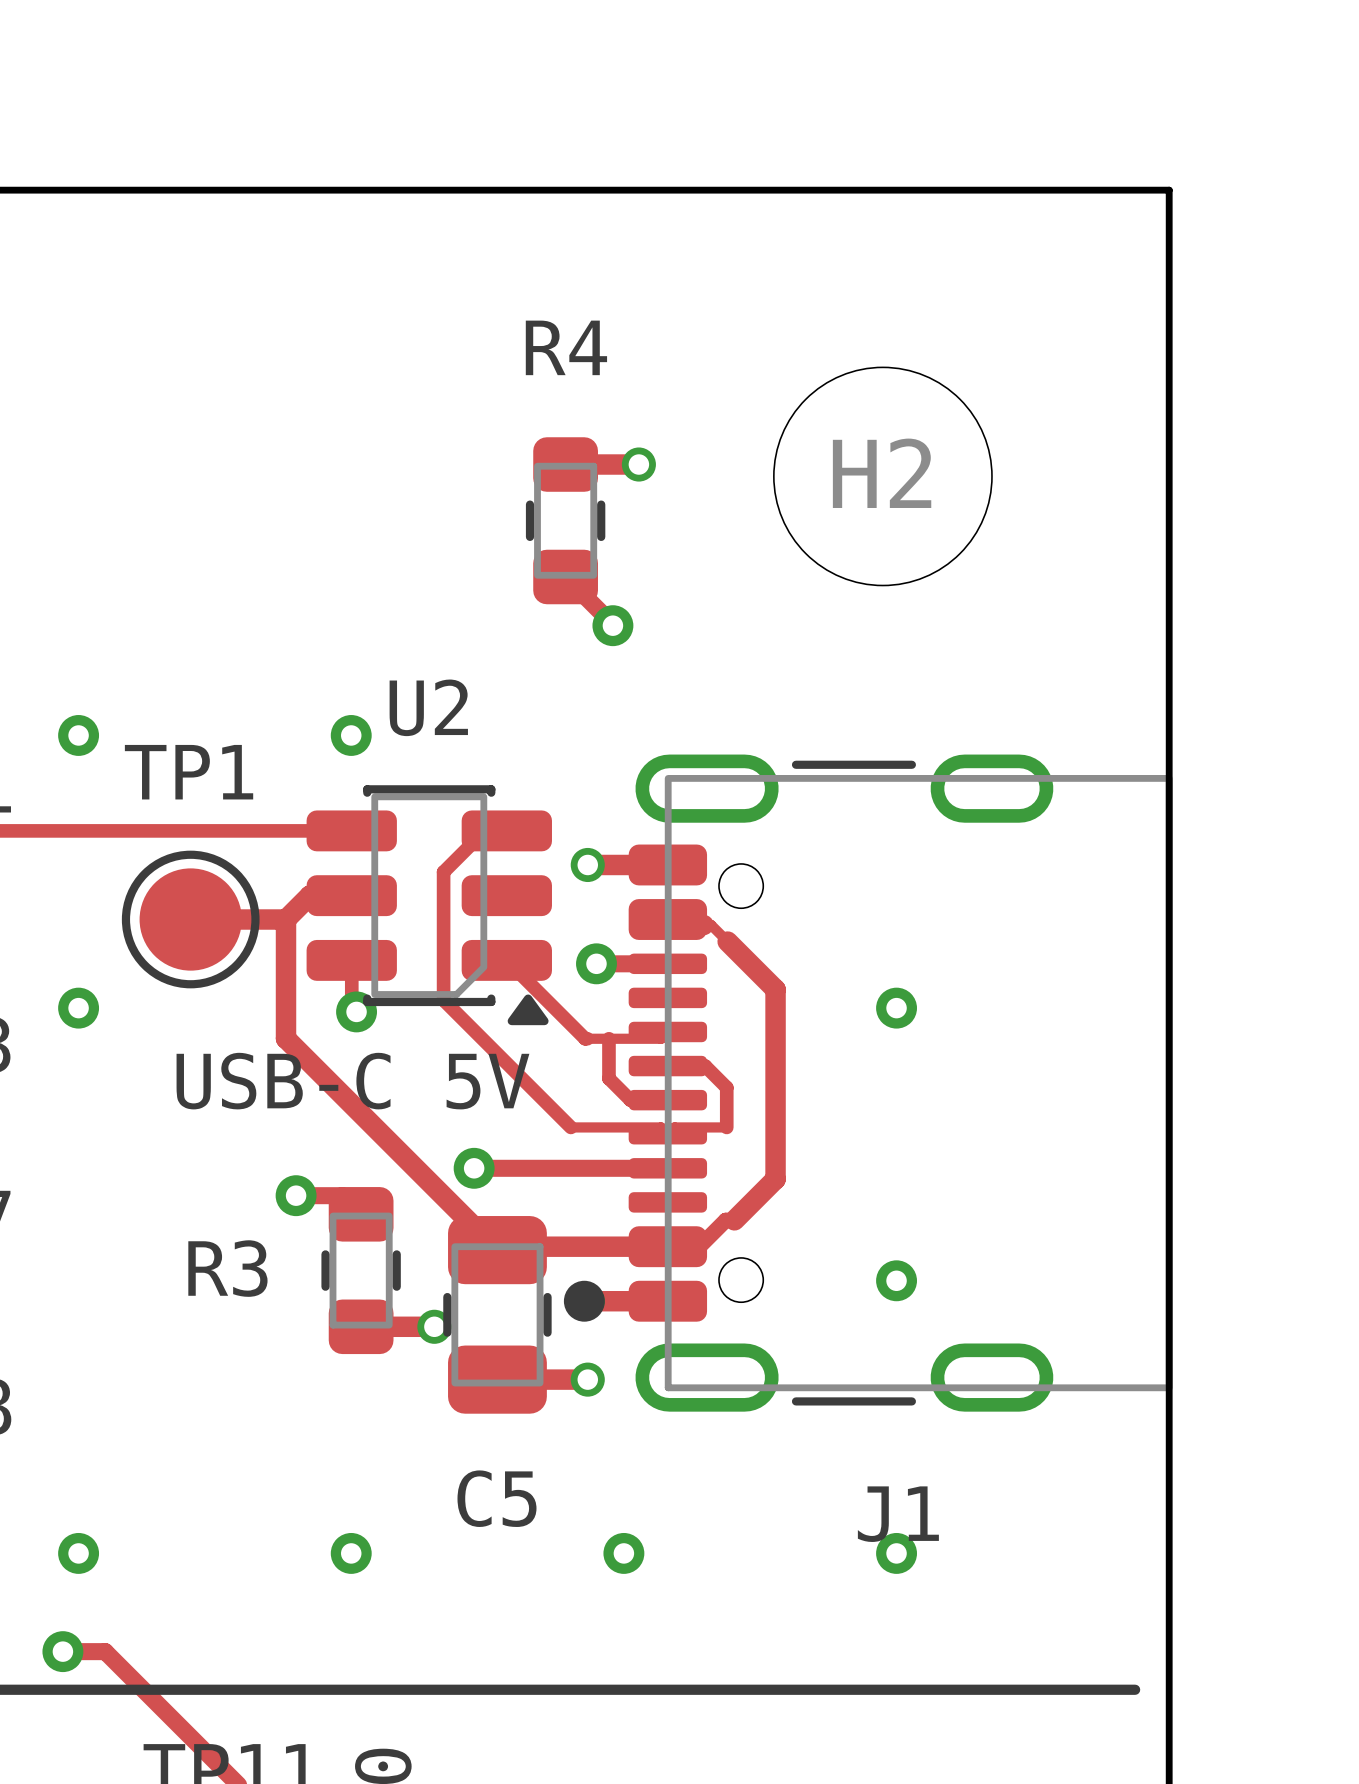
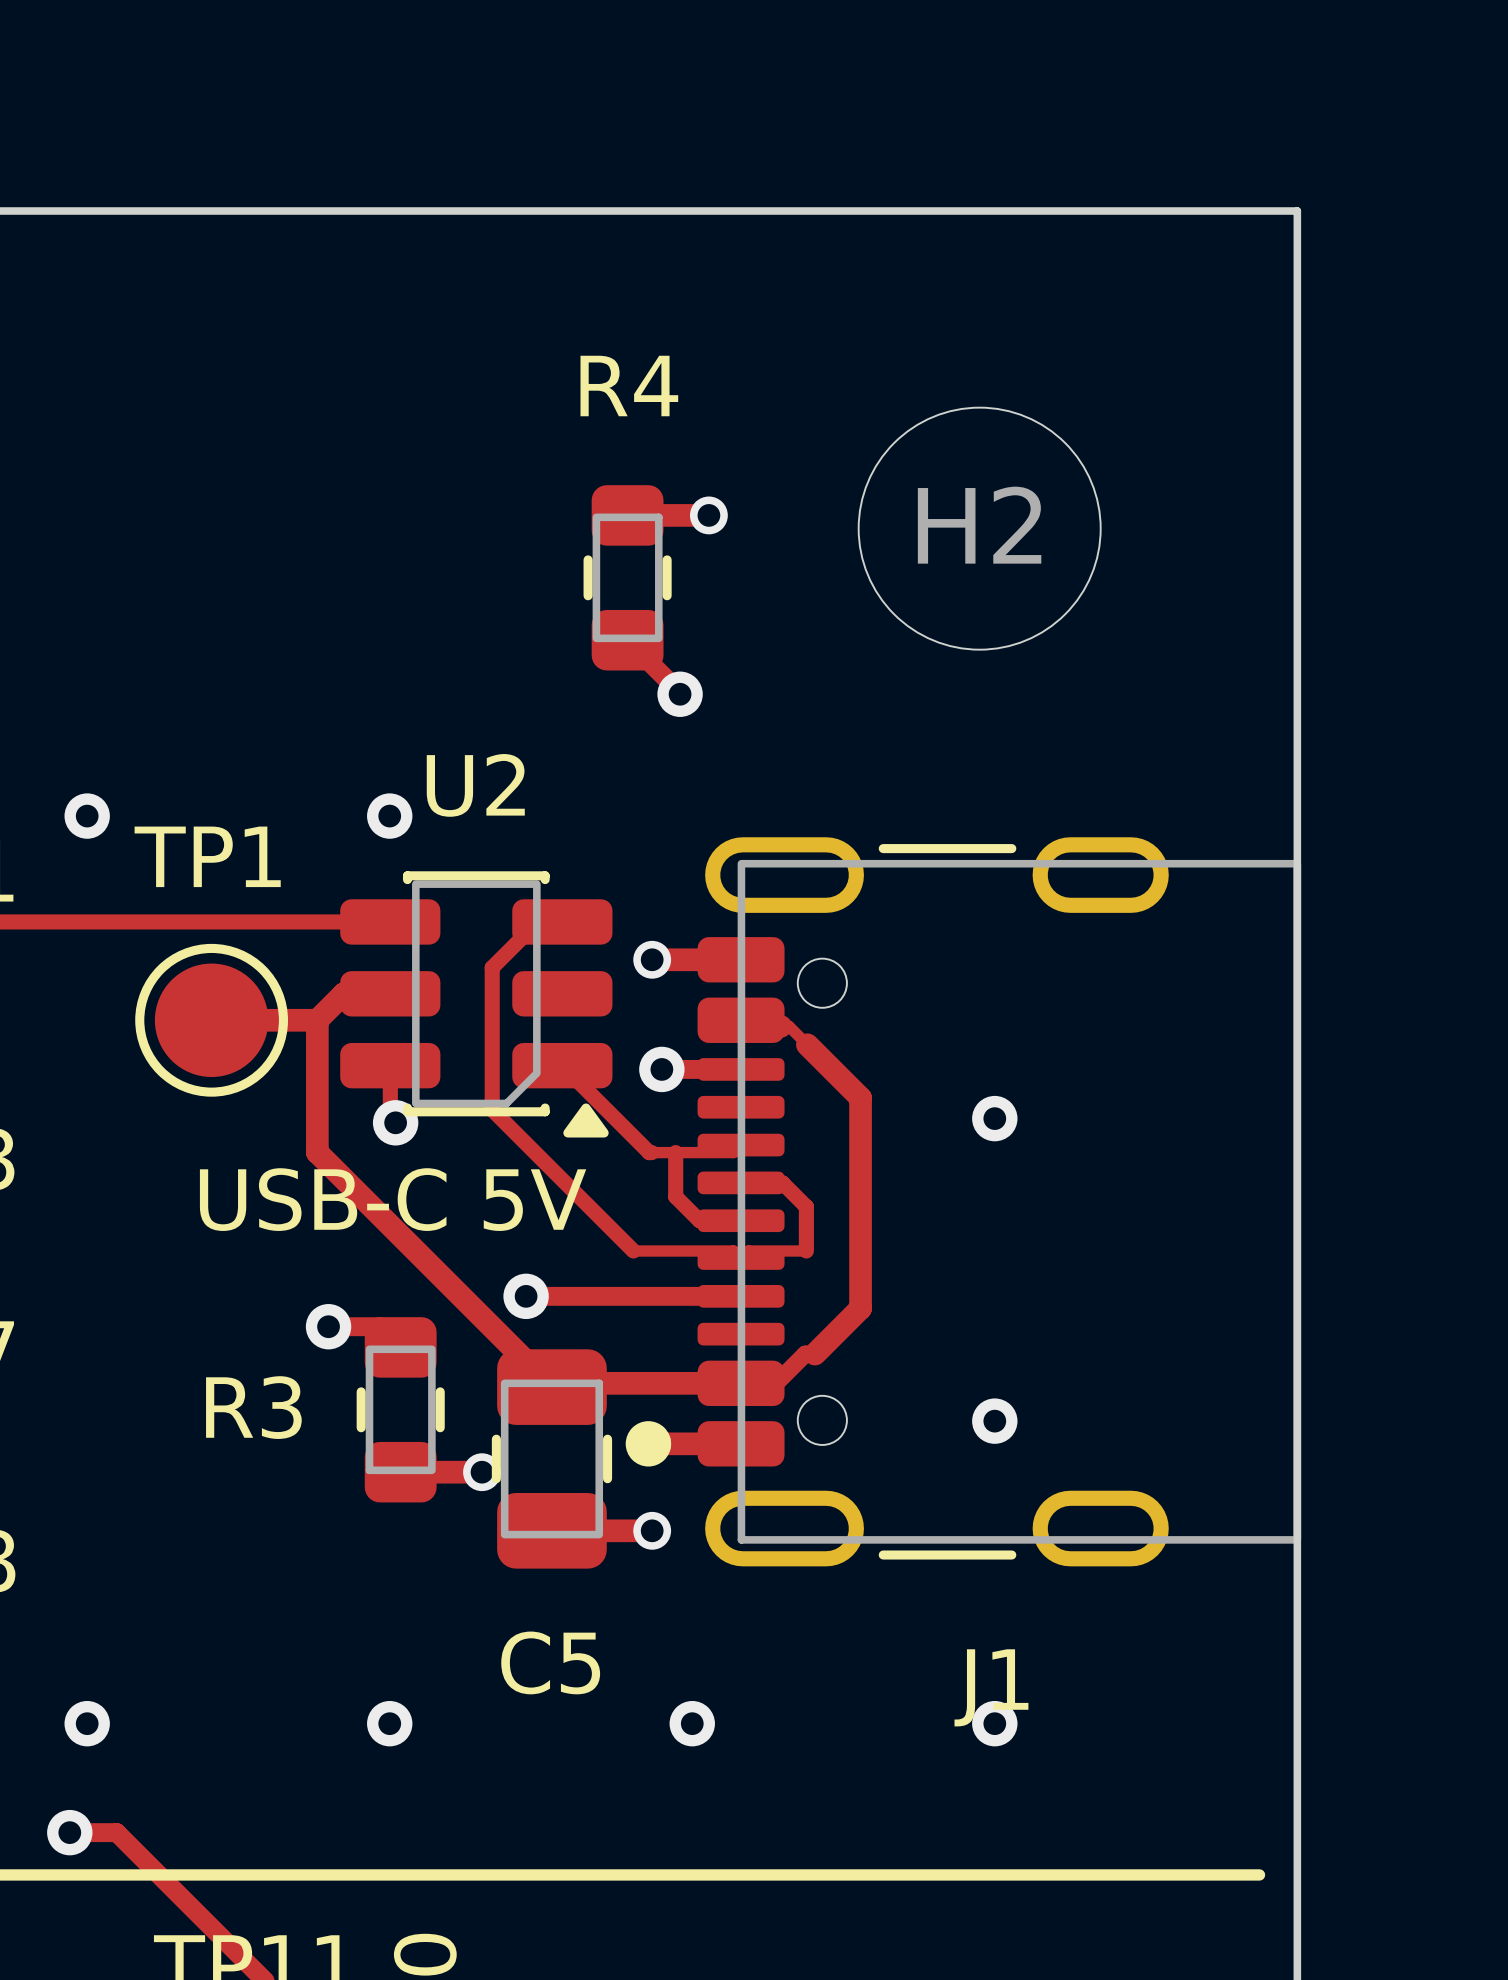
via: (78, 1008) -> none

